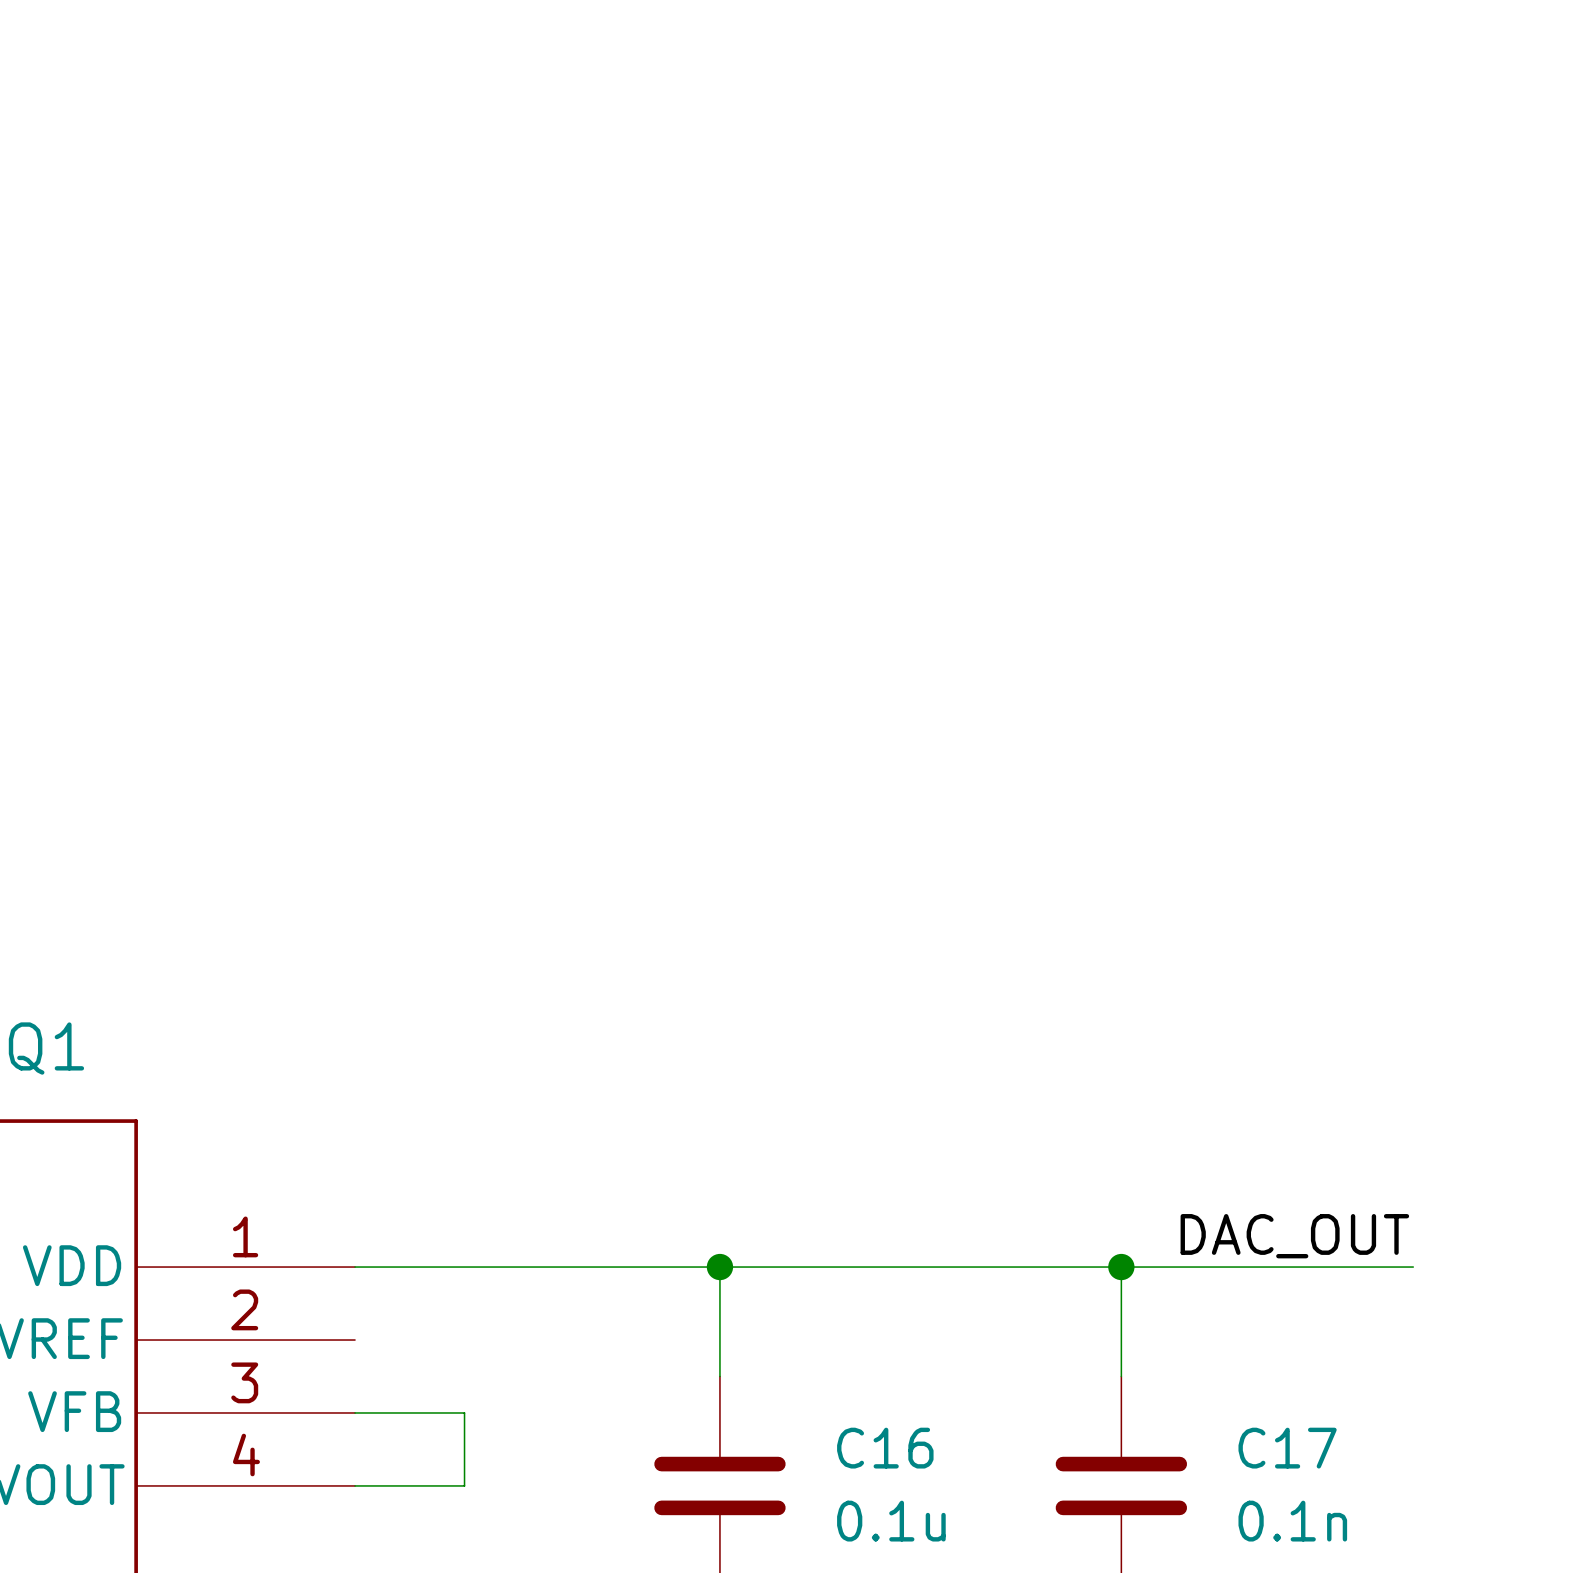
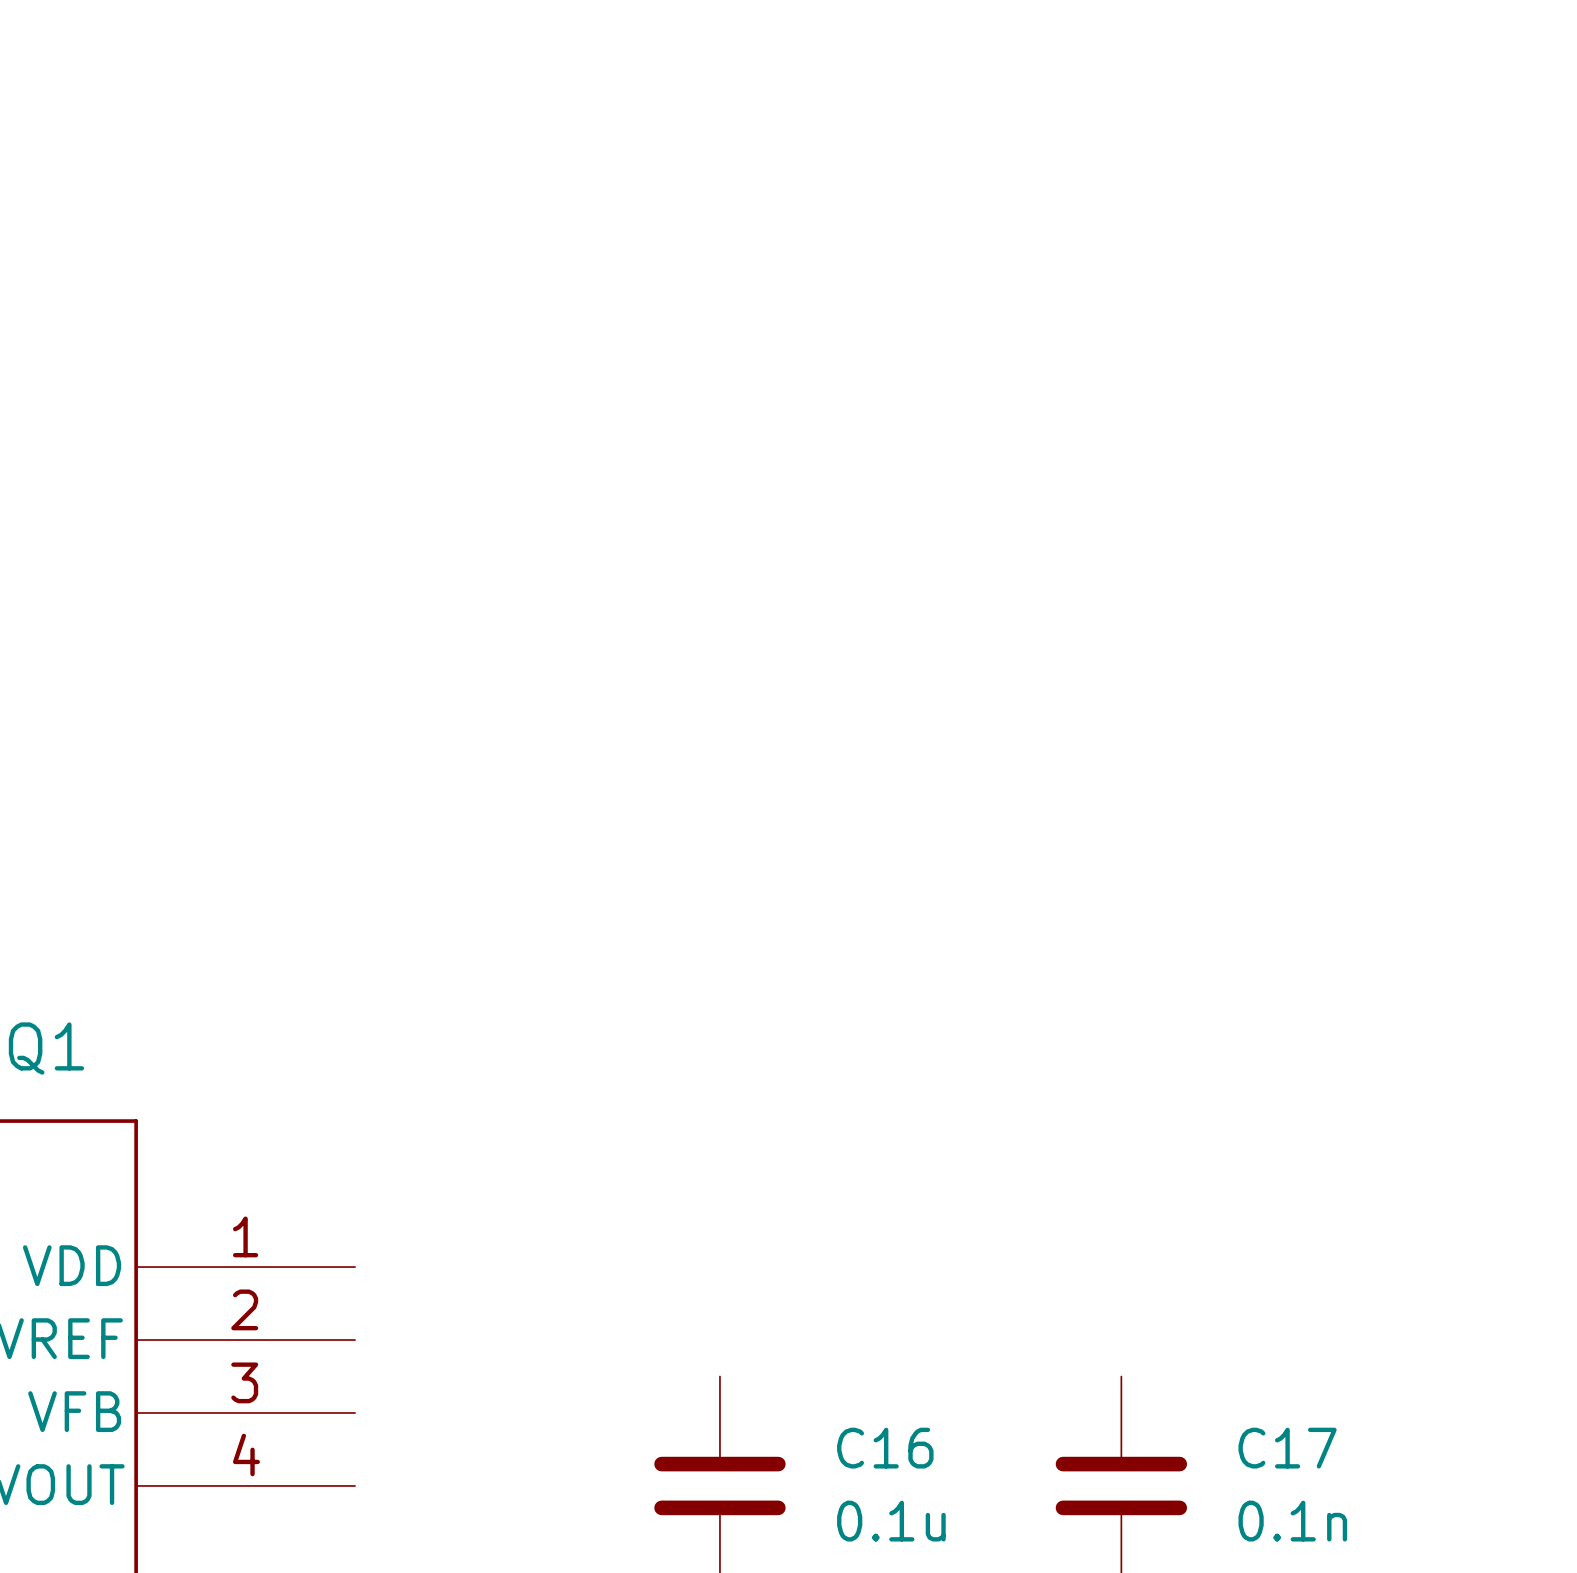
label: DAC_OUT (1294, 1236) -> none
wire: (355, 1267) (1413, 1267) -> none
wire: (719, 1267) (719, 1376) -> none
junction: (719, 1267) -> none
wire: (1121, 1267) (1121, 1376) -> none
junction: (1121, 1267) -> none
wire: (355, 1412) (464, 1412) (464, 1485) (355, 1485) -> none

